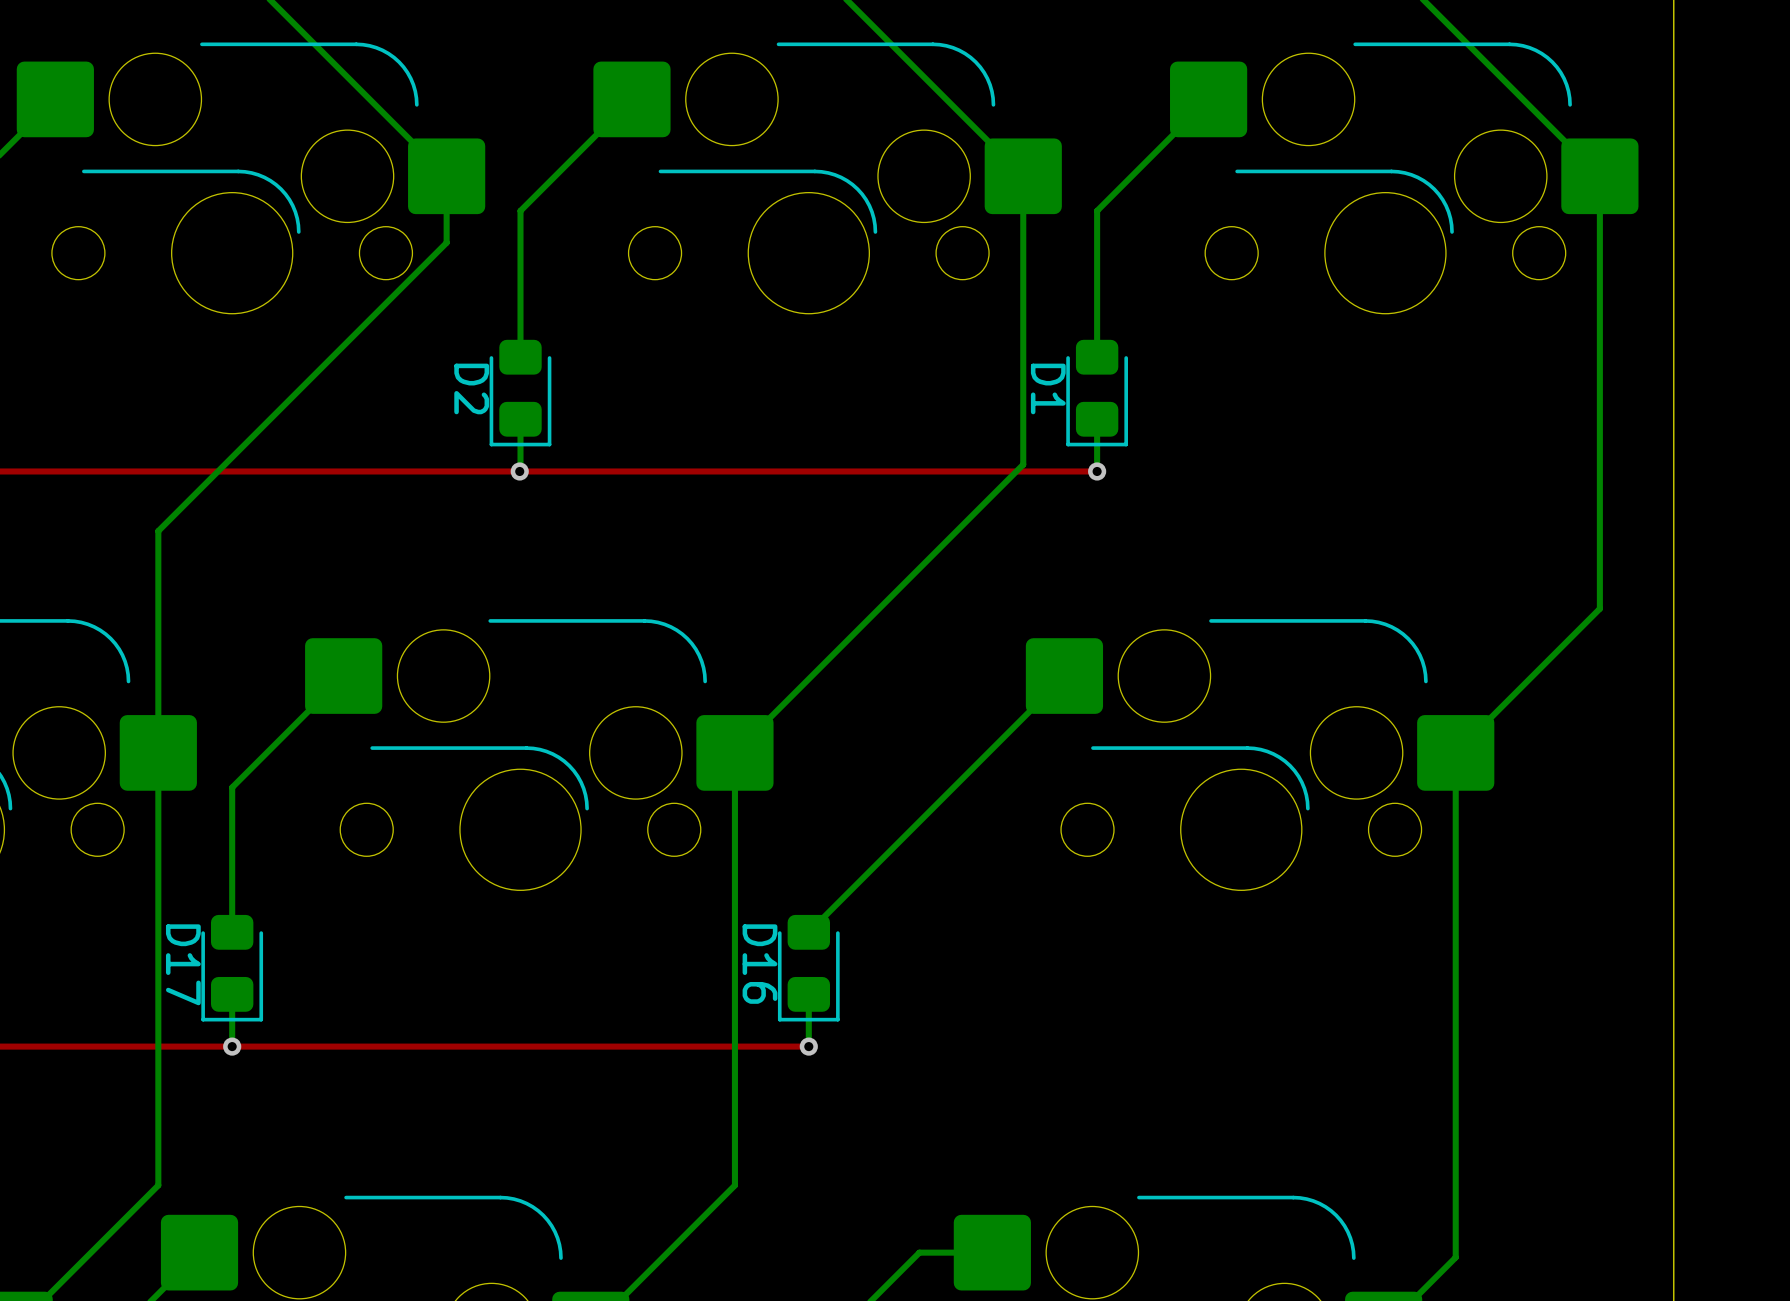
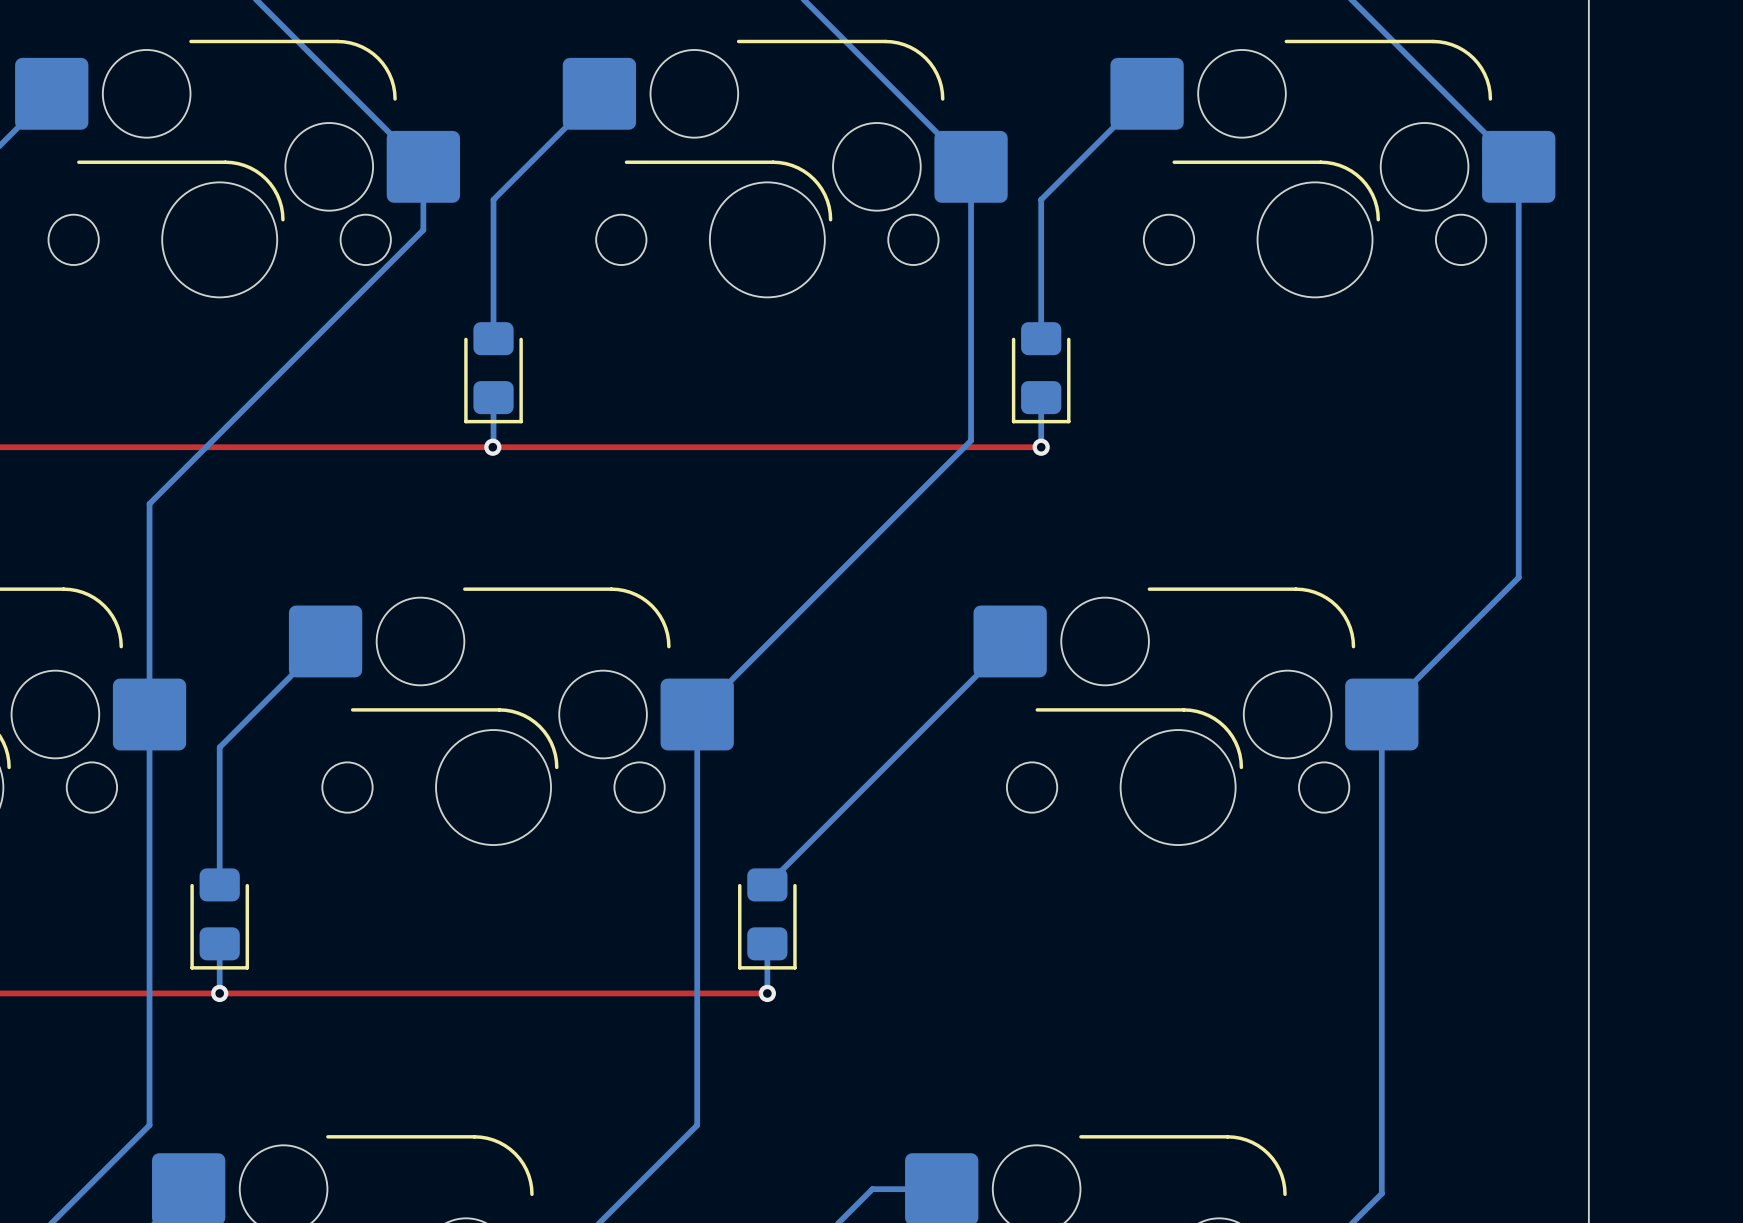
D2 name: D2 (471, 388) -> none
D1 name: D1 (1048, 388) -> none
D17 name: D17 (183, 964) -> none
D16 name: D16 (759, 964) -> none

